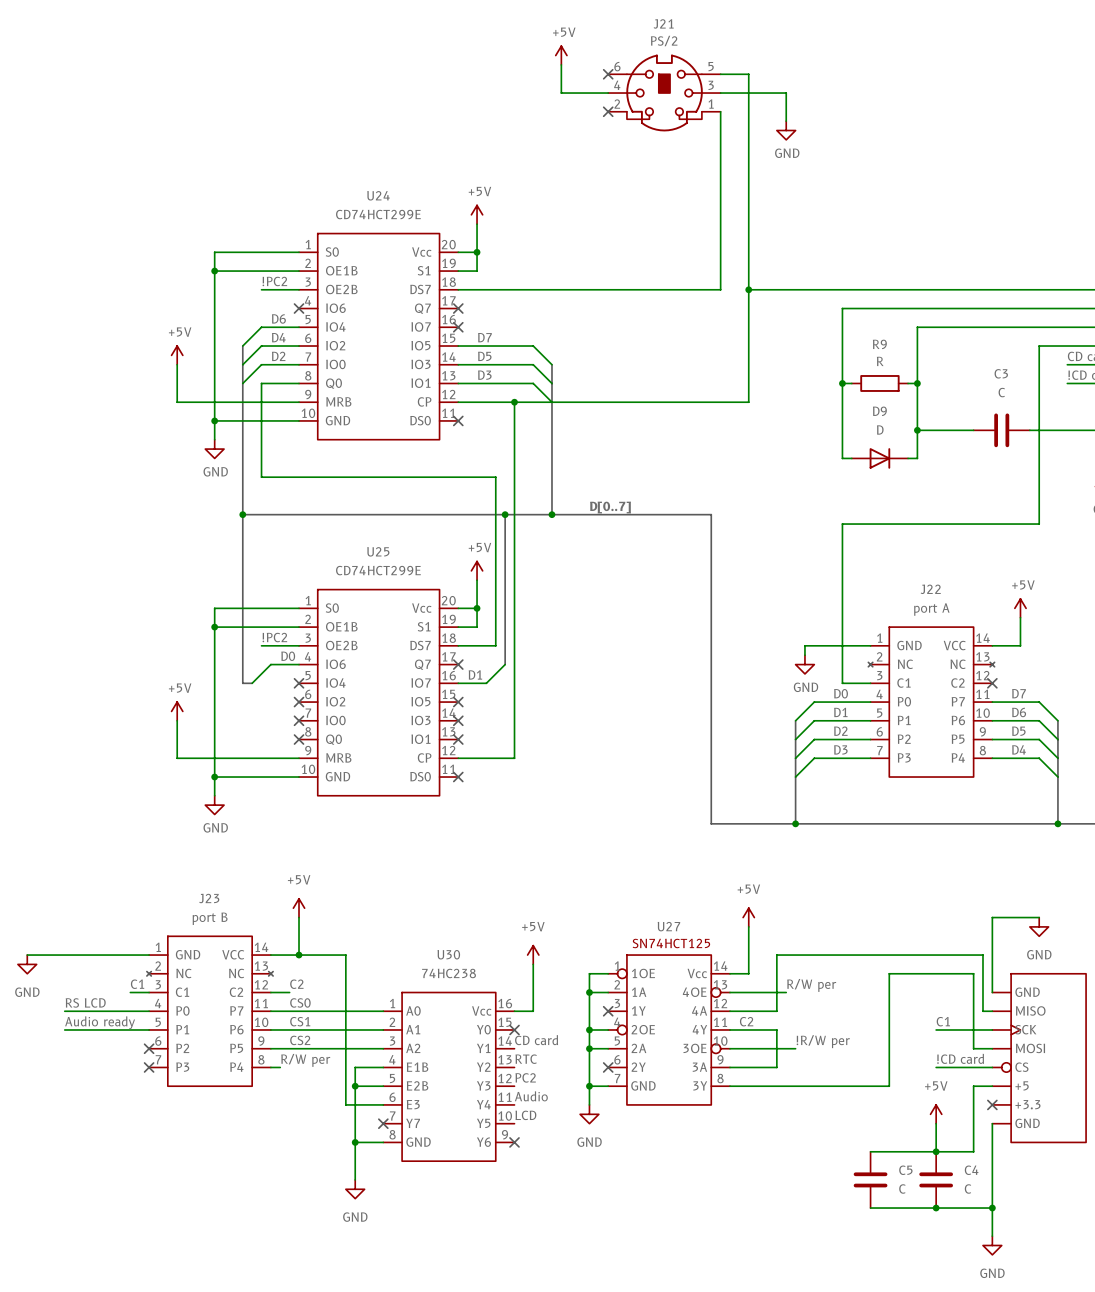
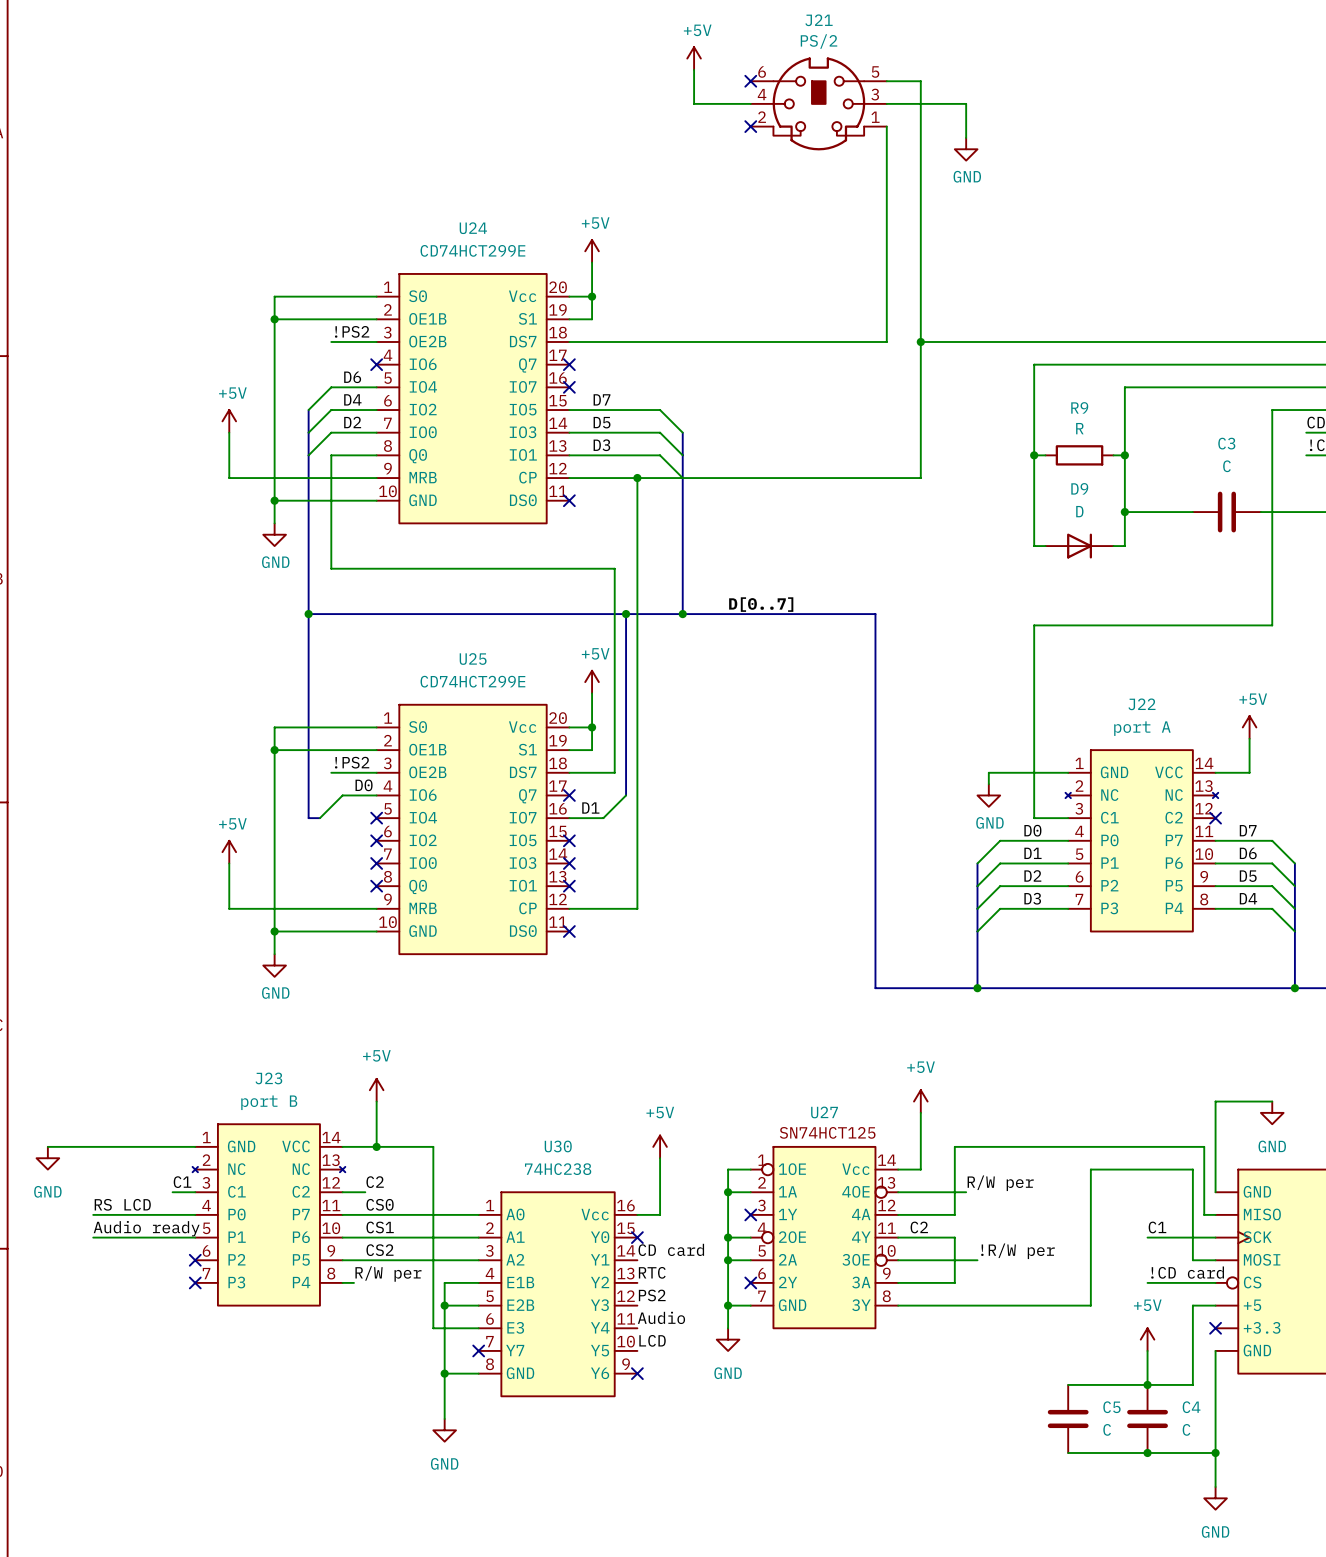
label: !PC2 (274, 281) -> !PS2 (352, 331)
label: !PC2 (274, 637) -> !PS2 (352, 762)
label: PC2 (525, 1077) -> PS2 (652, 1295)

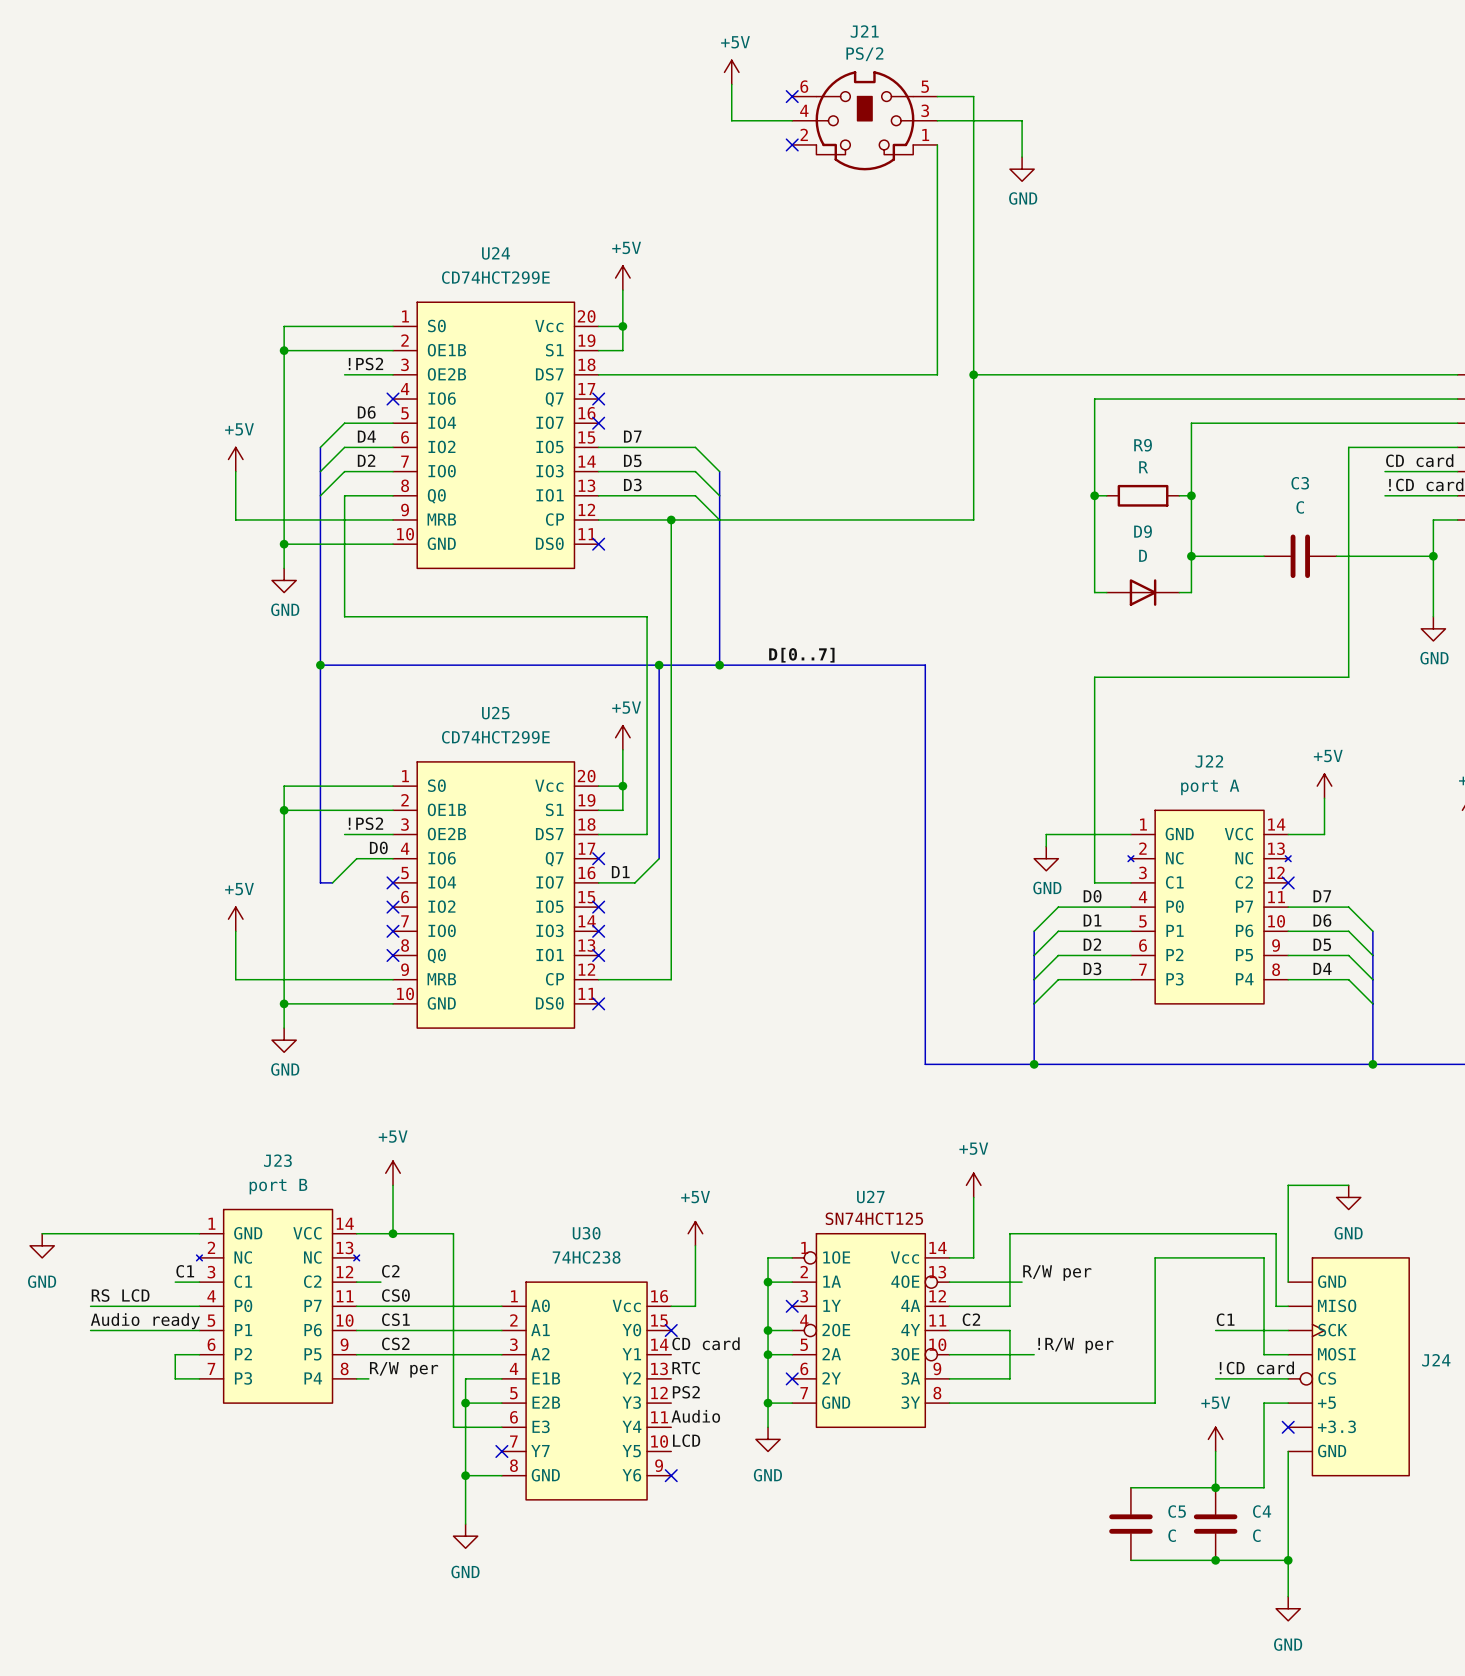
wire: none -> (199, 1354) (175, 1354) (175, 1378) (199, 1378)
no-connect mark: (195, 1260) -> none
no-connect mark: (195, 1282) -> none

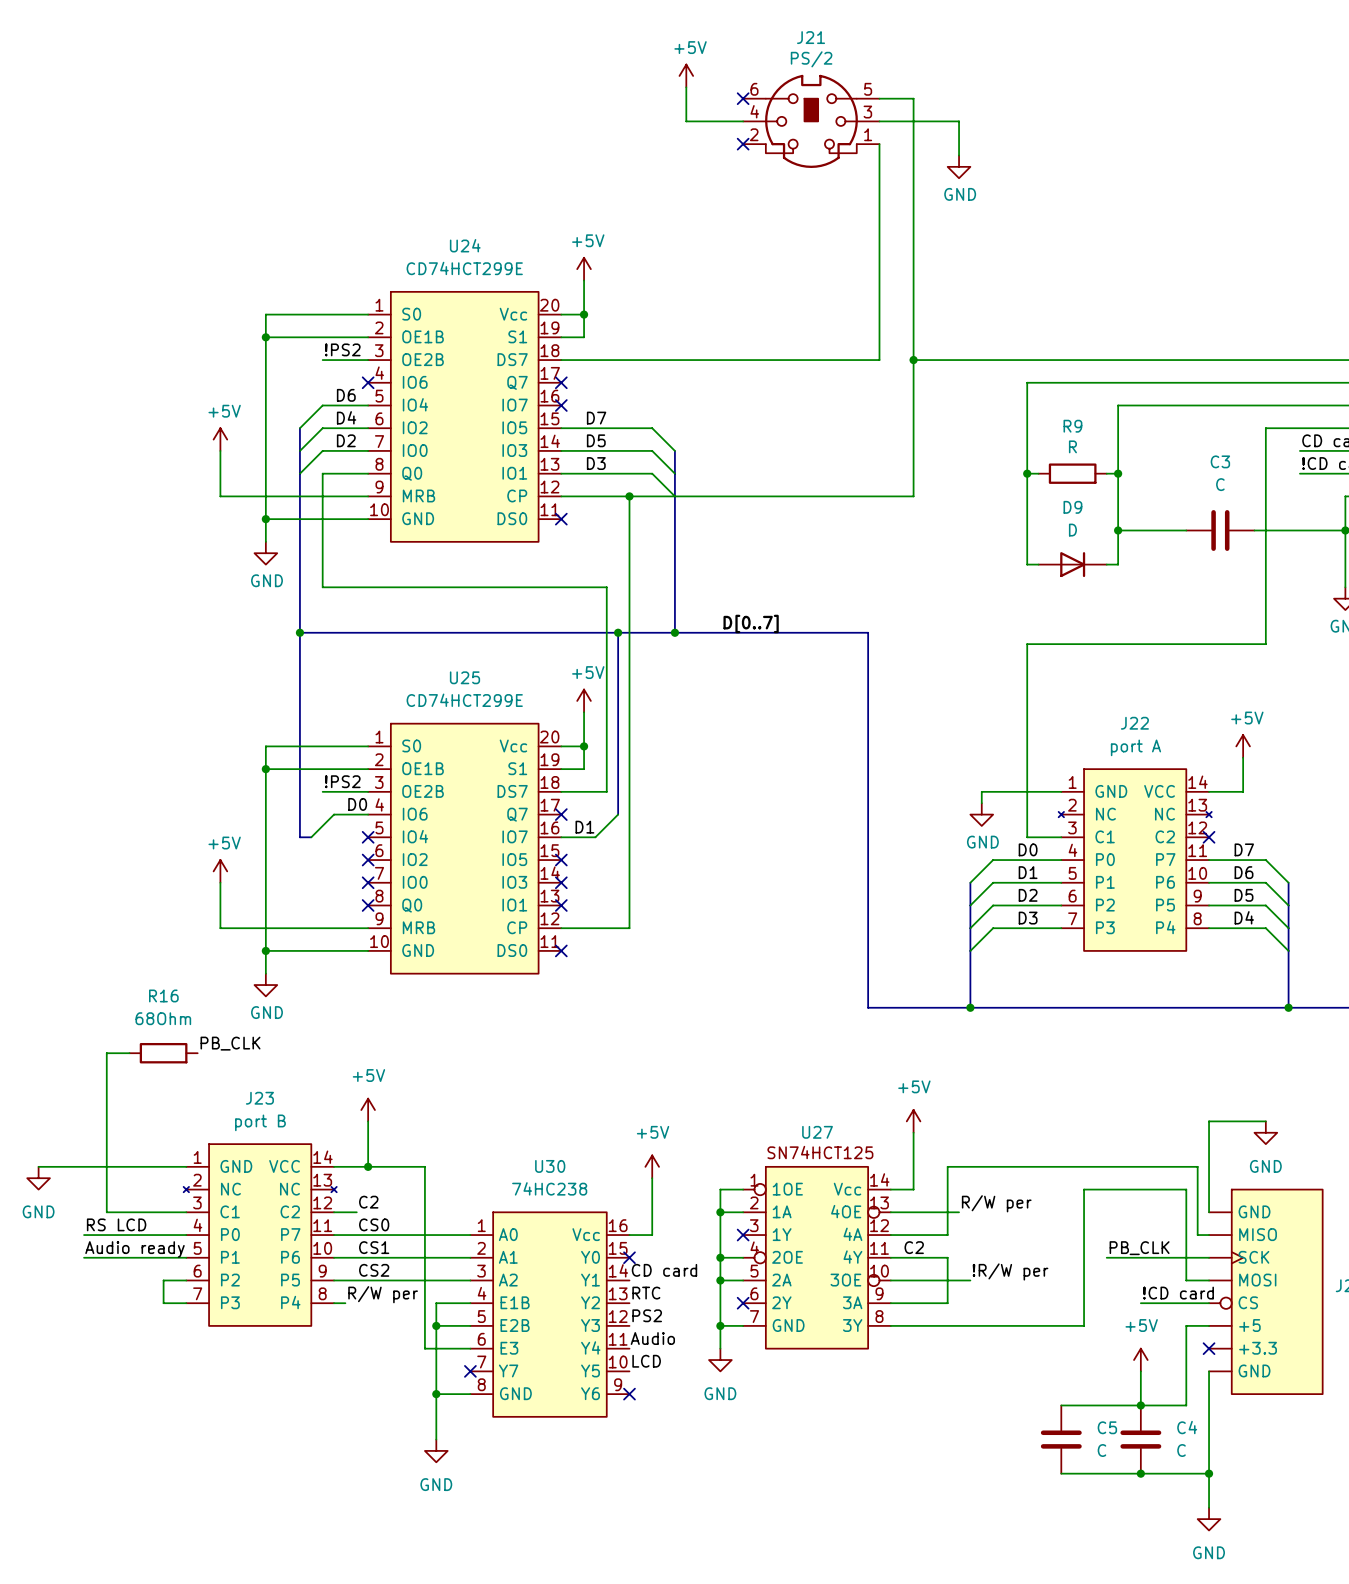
label: none -> PB_CLK (230, 1043)
wire: none -> (129, 1053) (106, 1053) (106, 1212) (163, 1212)
R16: none -> 68Ohm (163, 1053)
label: C1 (185, 1271) -> none
label: C1 (1225, 1319) -> none
label: none -> PB_CLK (1139, 1248)
wire: none -> (1106, 1257) (1140, 1257)

